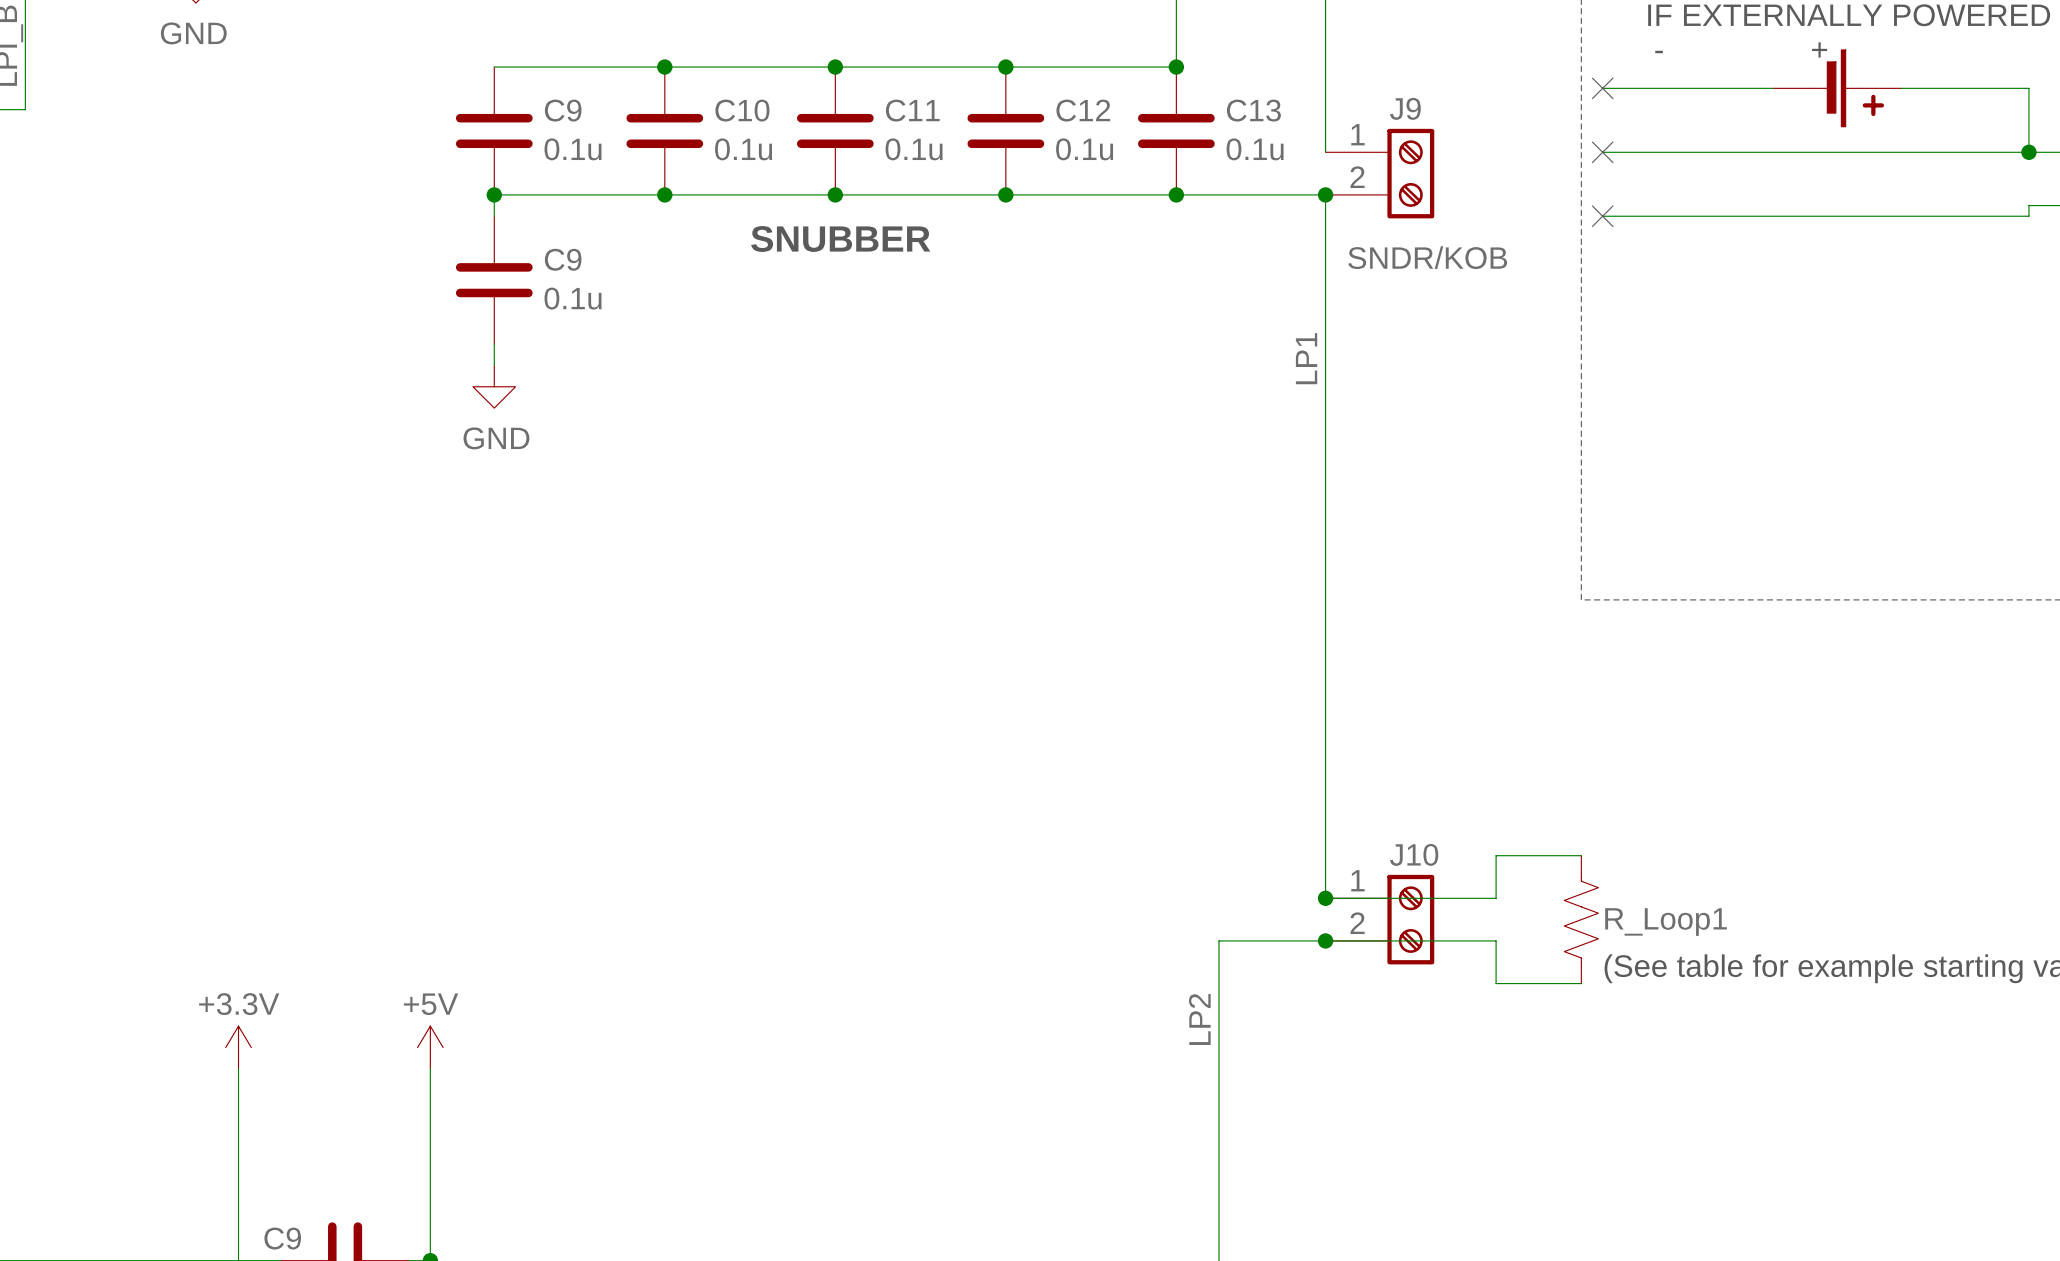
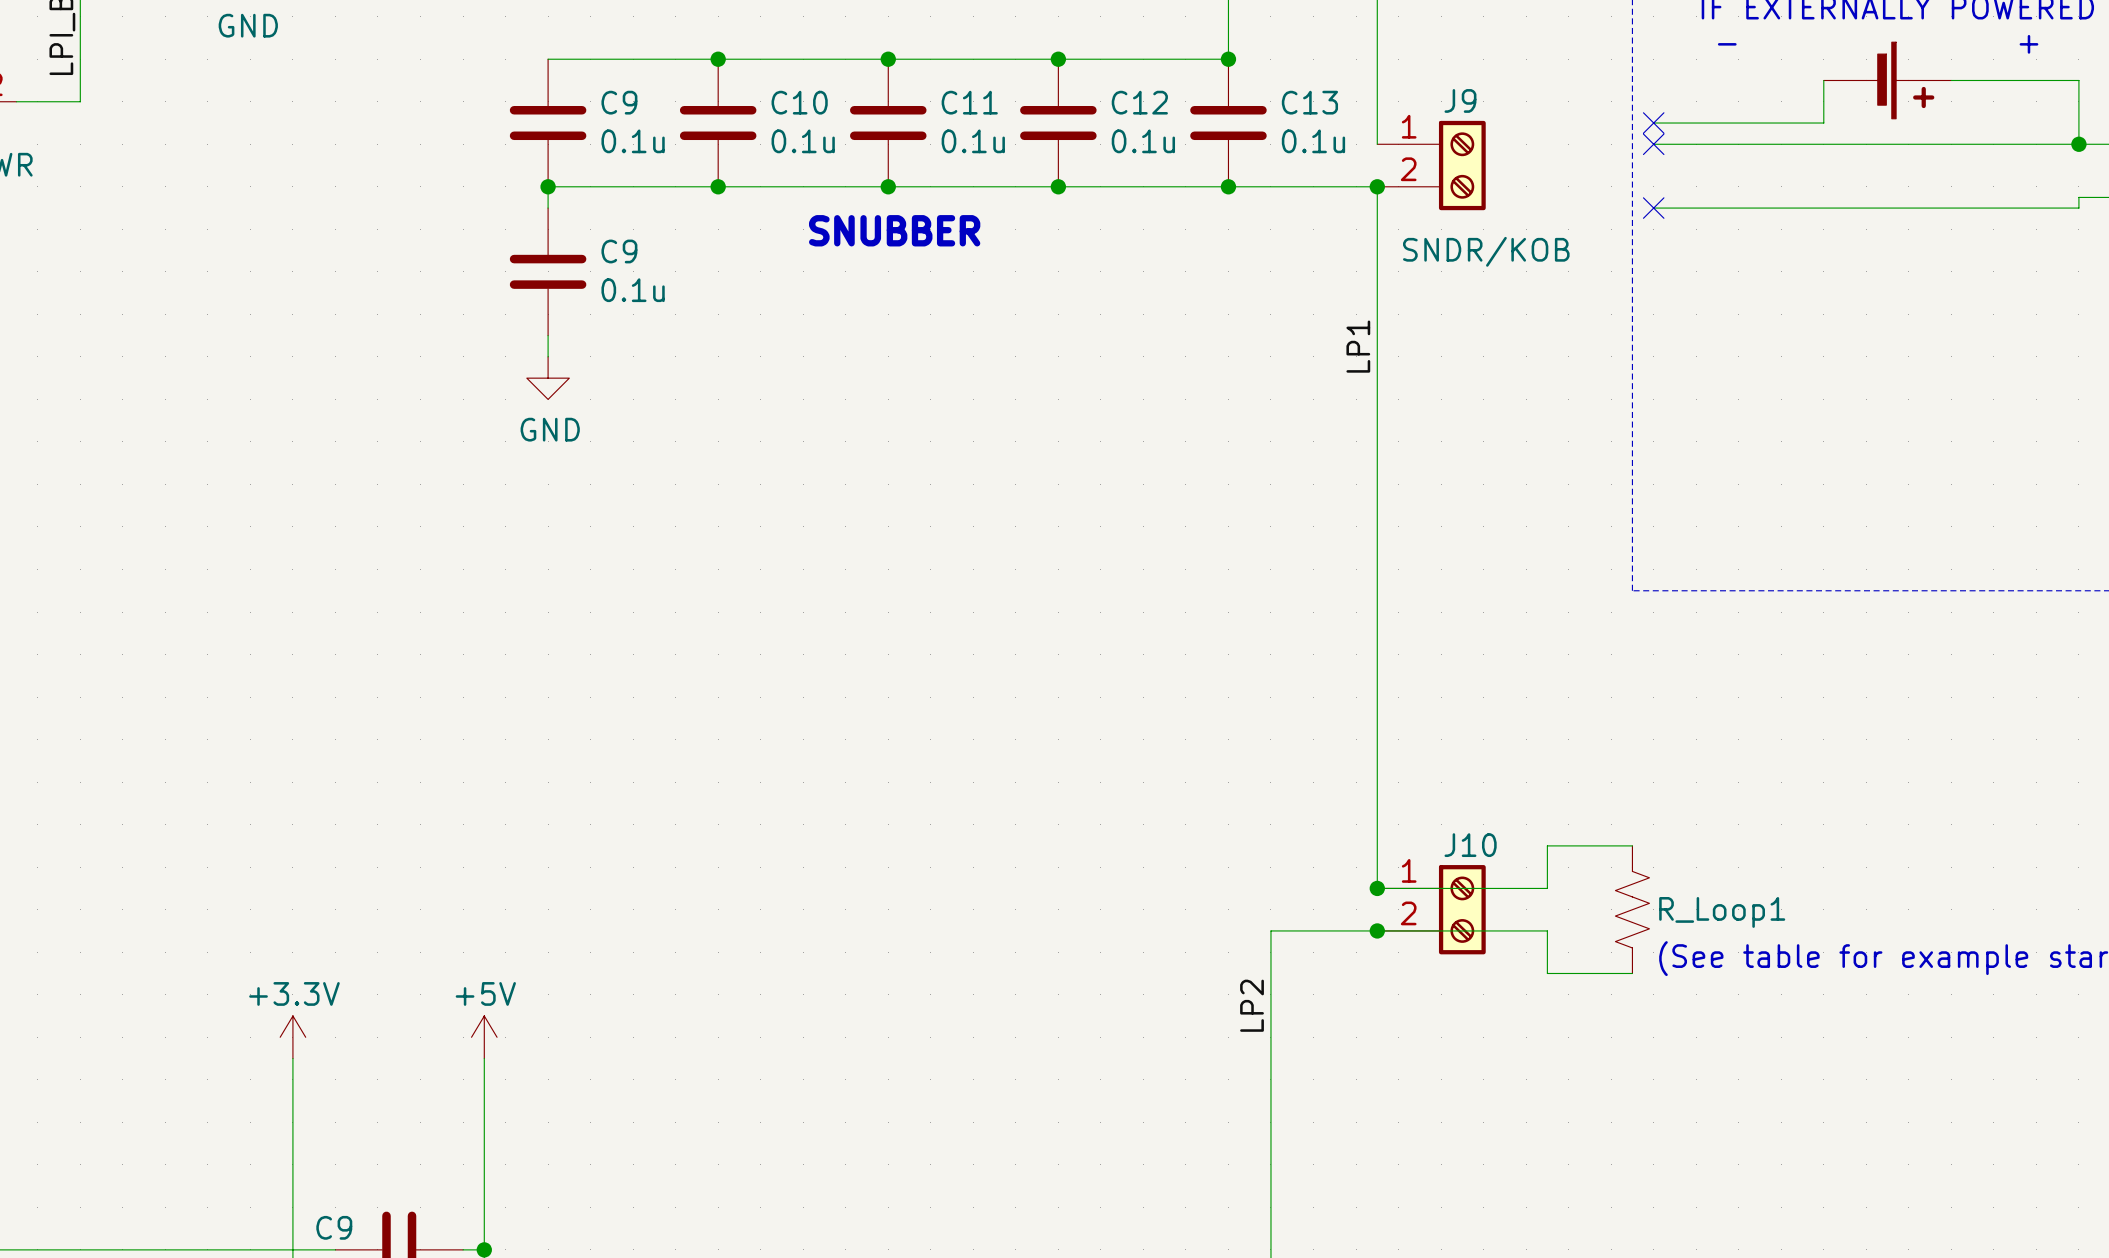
wire: (1602, 88) (1773, 88) -> (1653, 123) (1823, 123) (1823, 80)
no-connect mark position: (1602, 88) -> (1653, 123)

